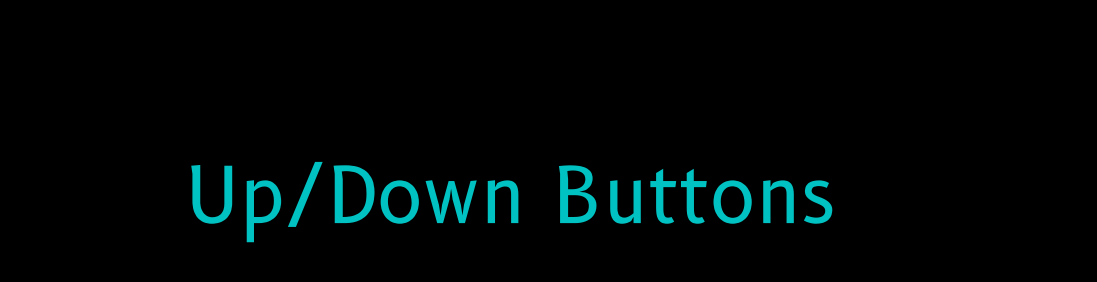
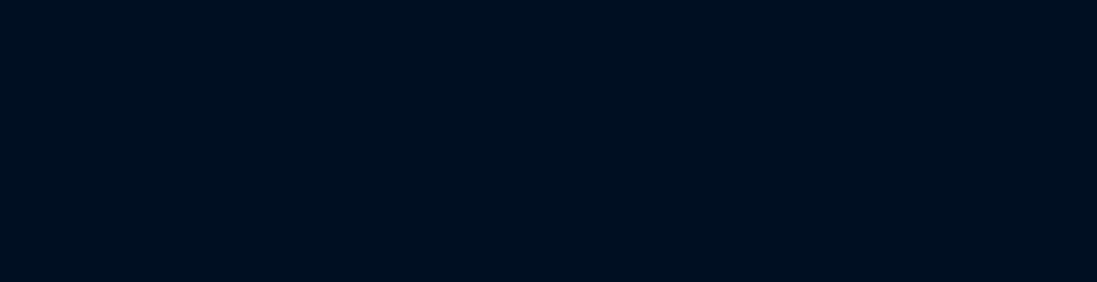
text: Up/Down Buttons (511, 202) -> none

